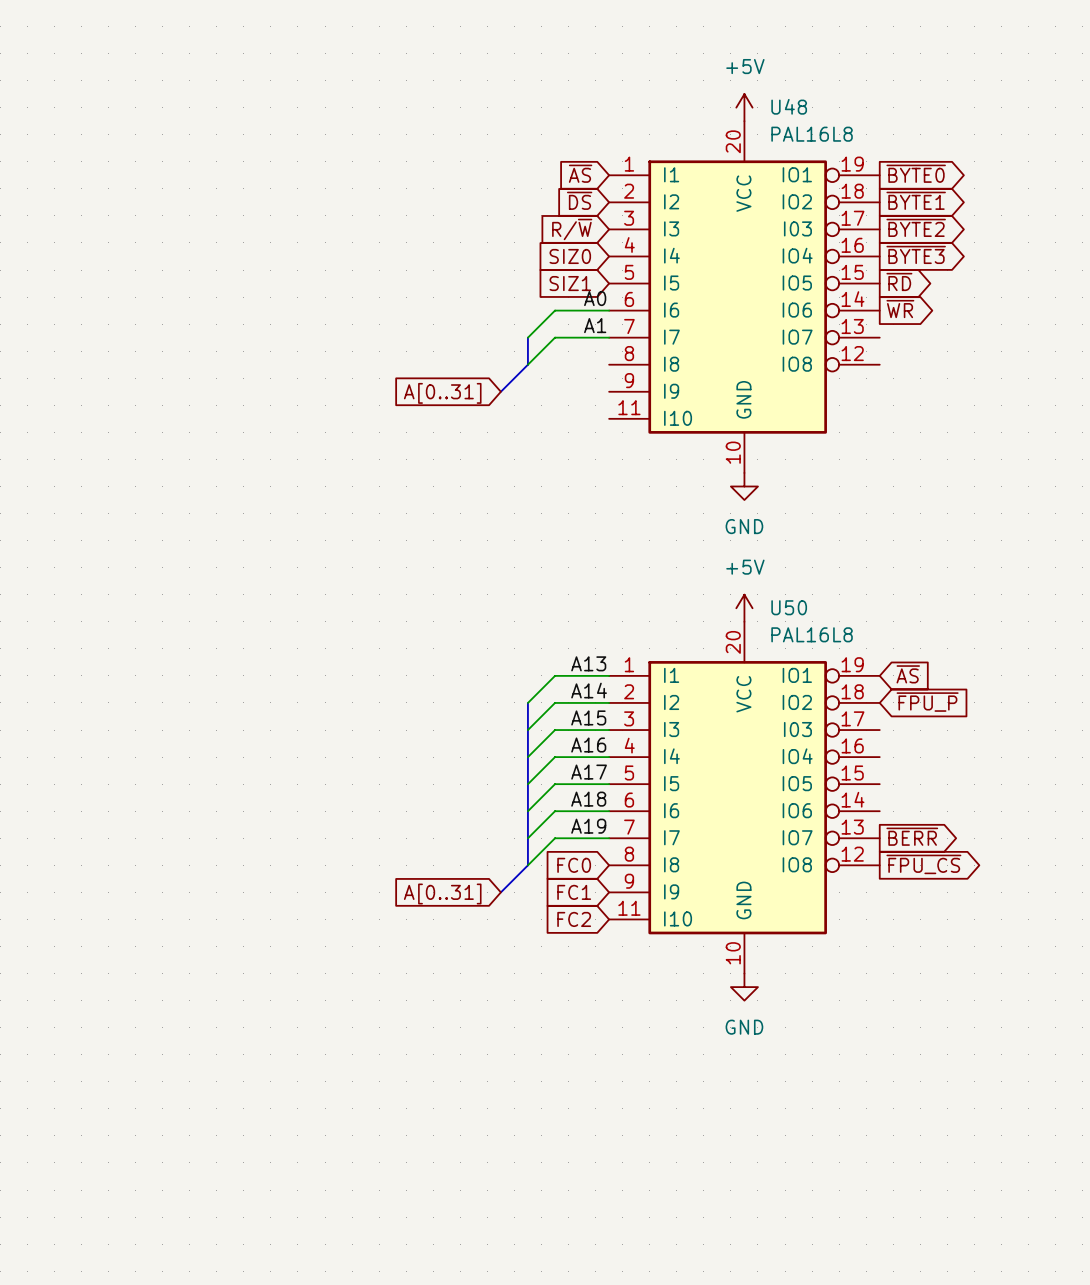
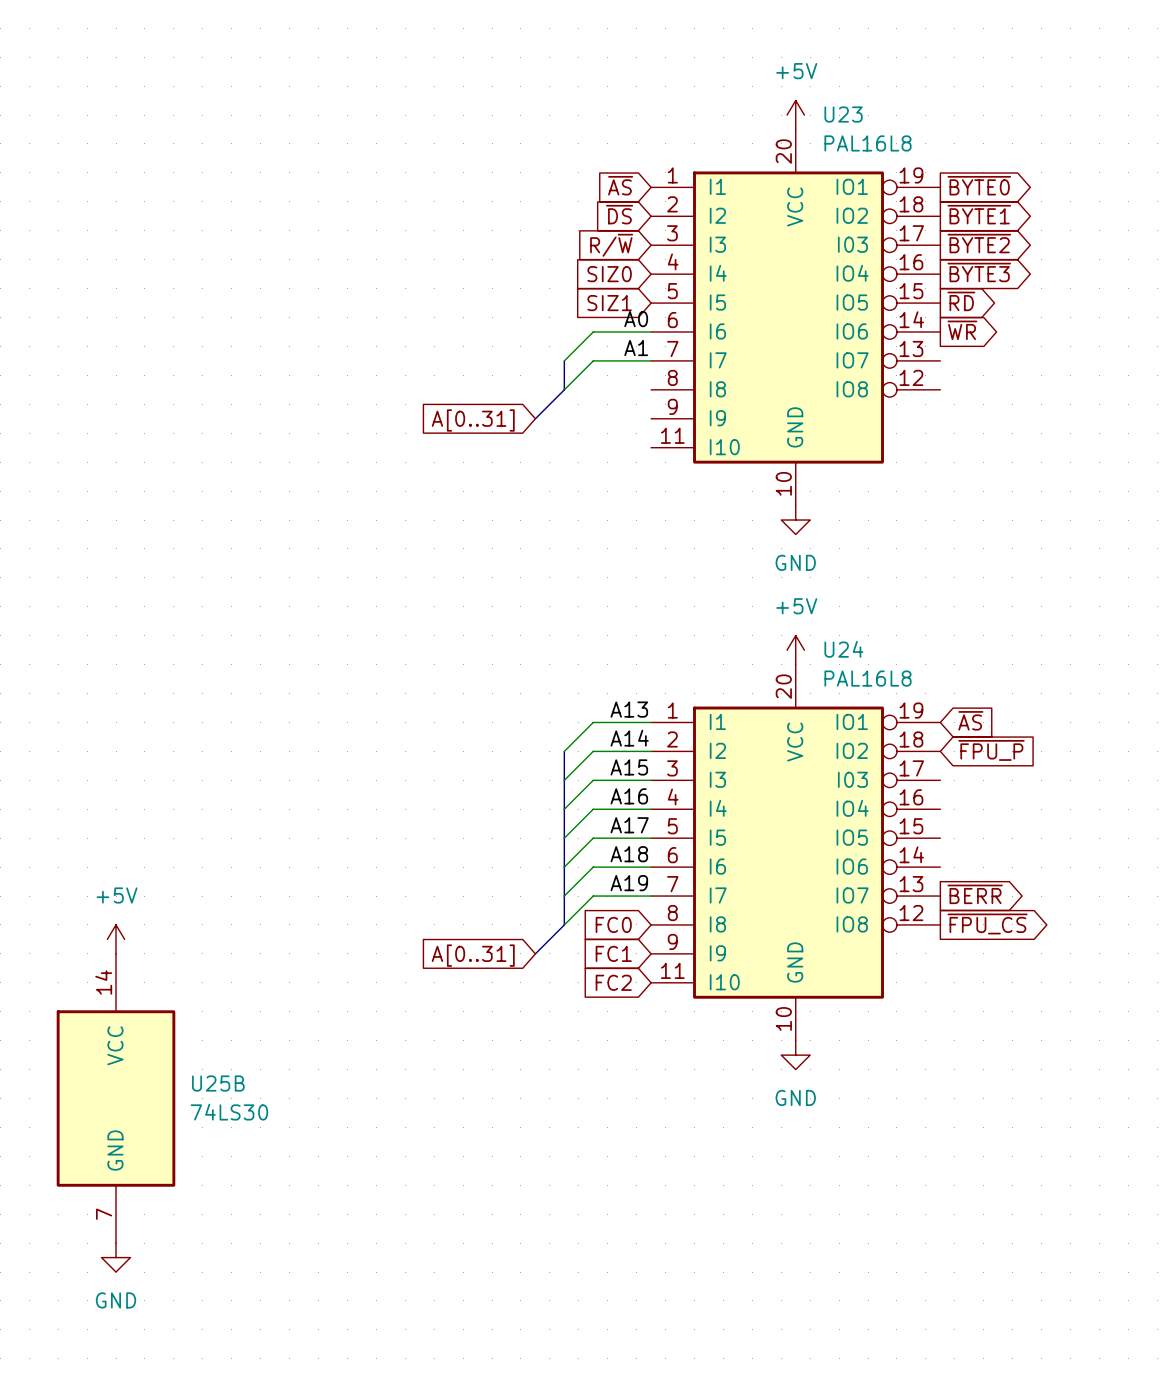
U48 name: U48 (789, 106) -> U23 (843, 114)
U50 name: U50 (789, 607) -> U24 (843, 649)
power symbol: none -> +5V (116, 939)
U25B: none -> 74LS30 (116, 1098)
power symbol: none -> GND (116, 1257)

